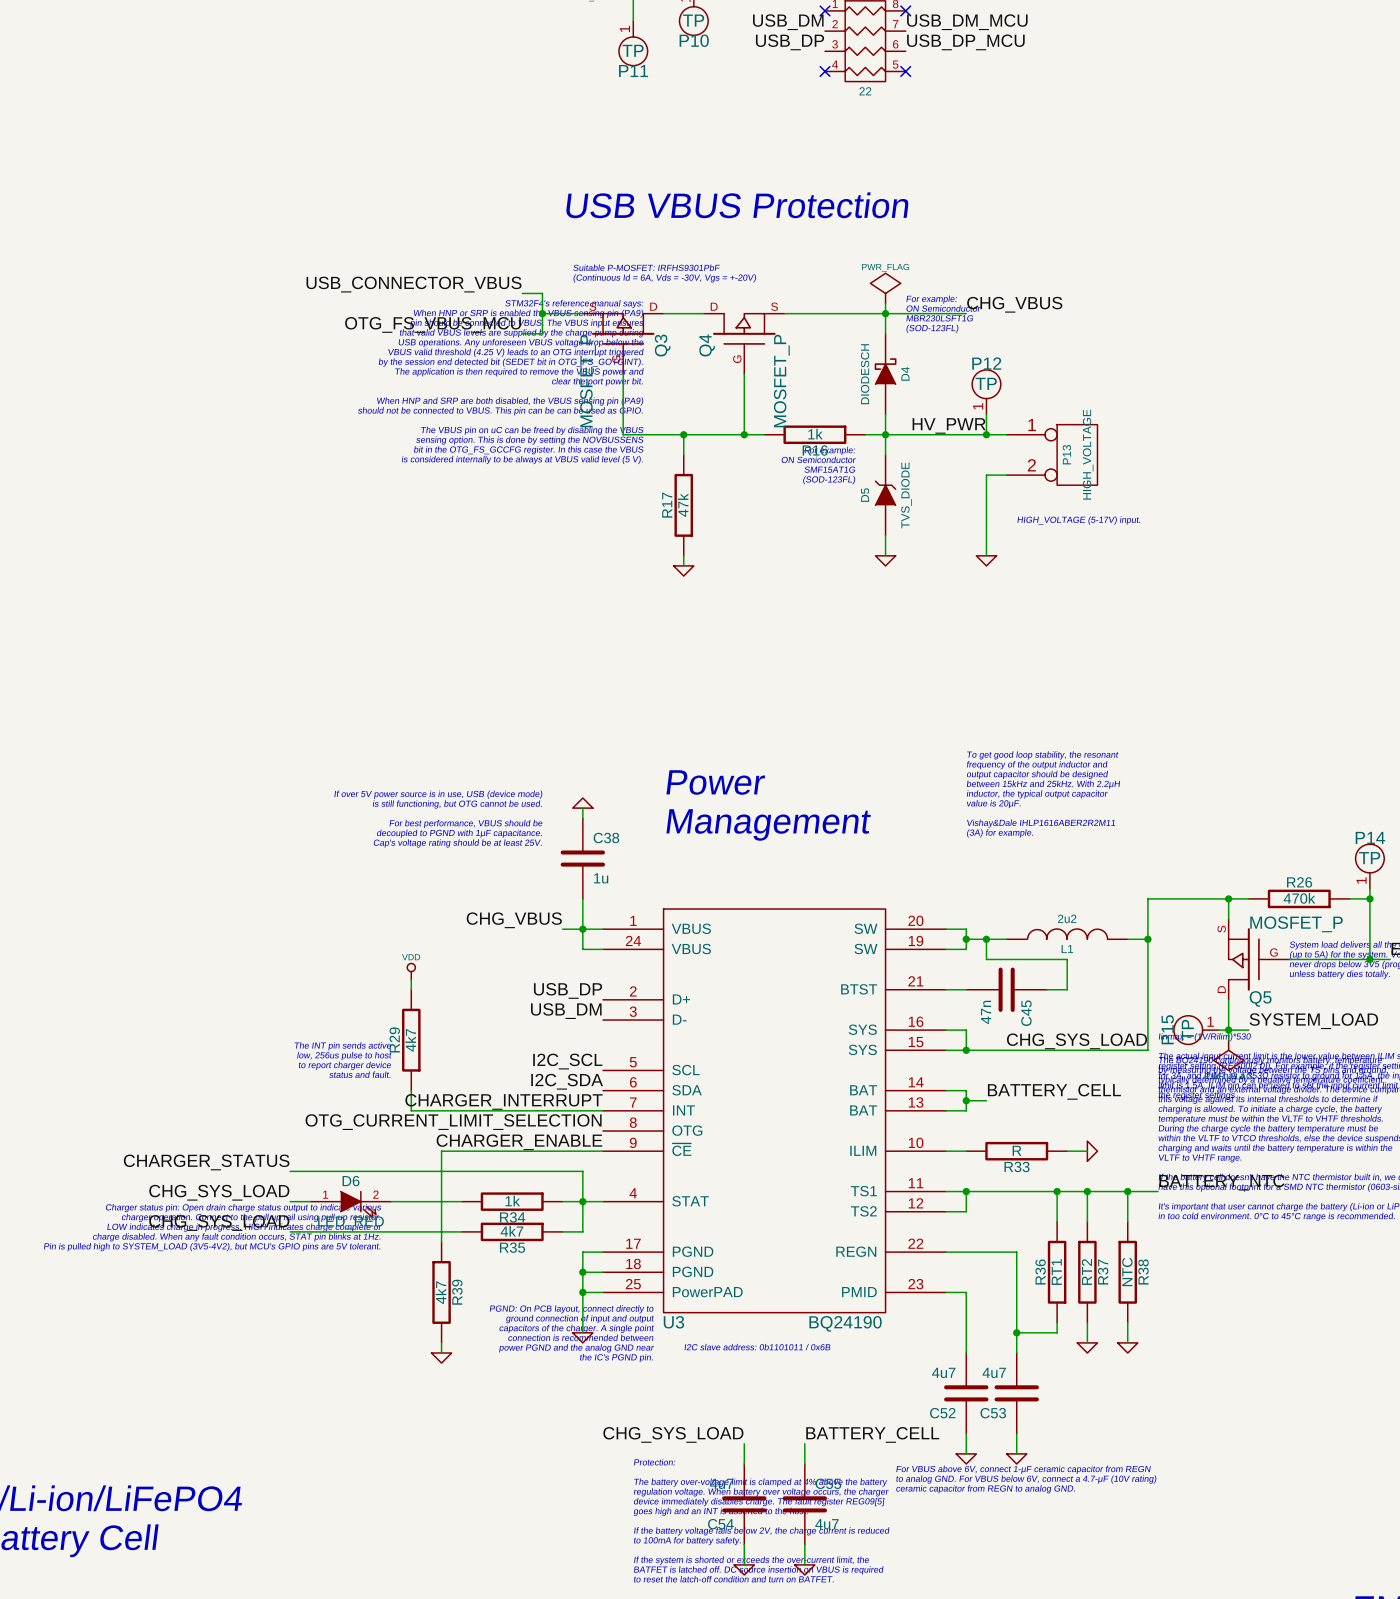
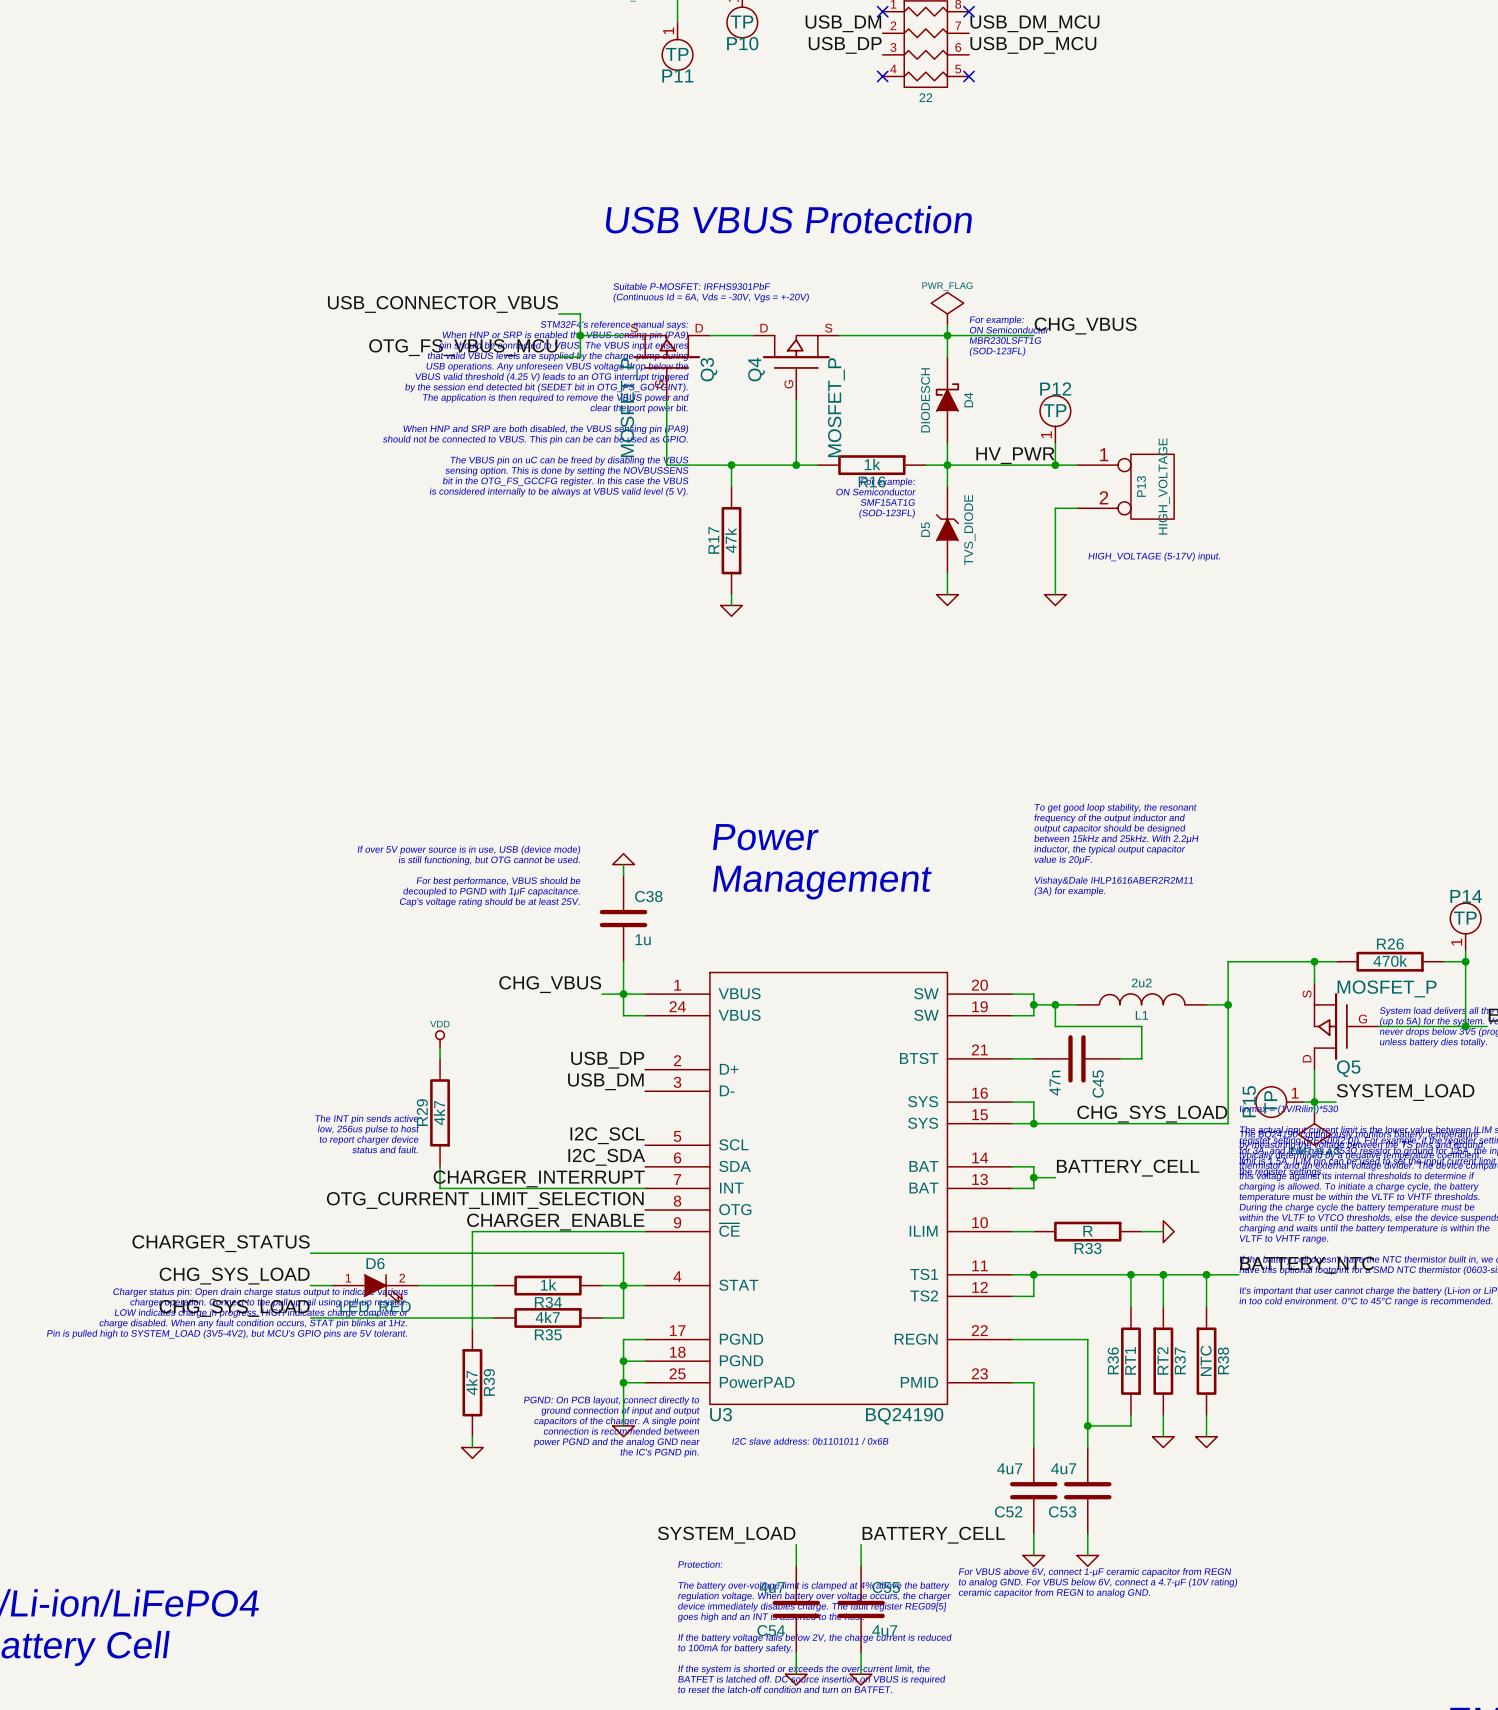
label: CHG_SYS_LOAD (673, 1434) -> SYSTEM_LOAD (726, 1535)

